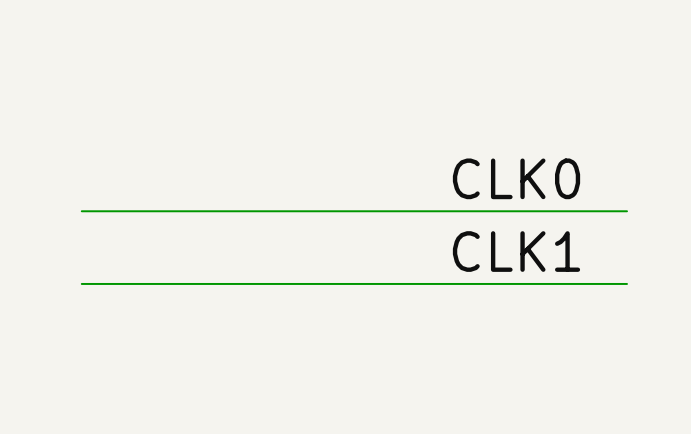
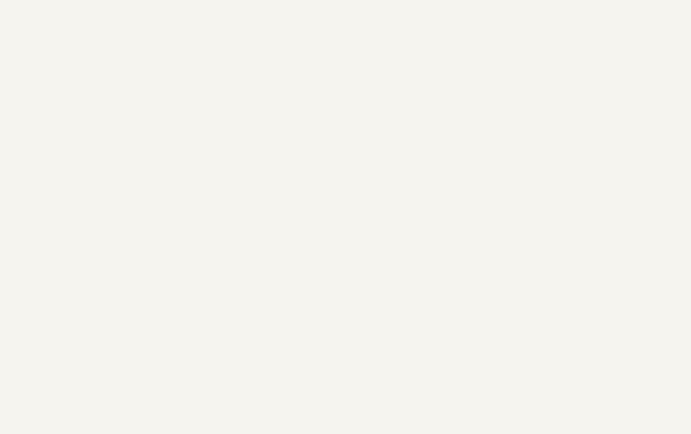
label: CLK0 (516, 178) -> none
wire: (81, 211) (627, 211) -> none
label: CLK1 (516, 251) -> none
wire: (81, 283) (627, 283) -> none

